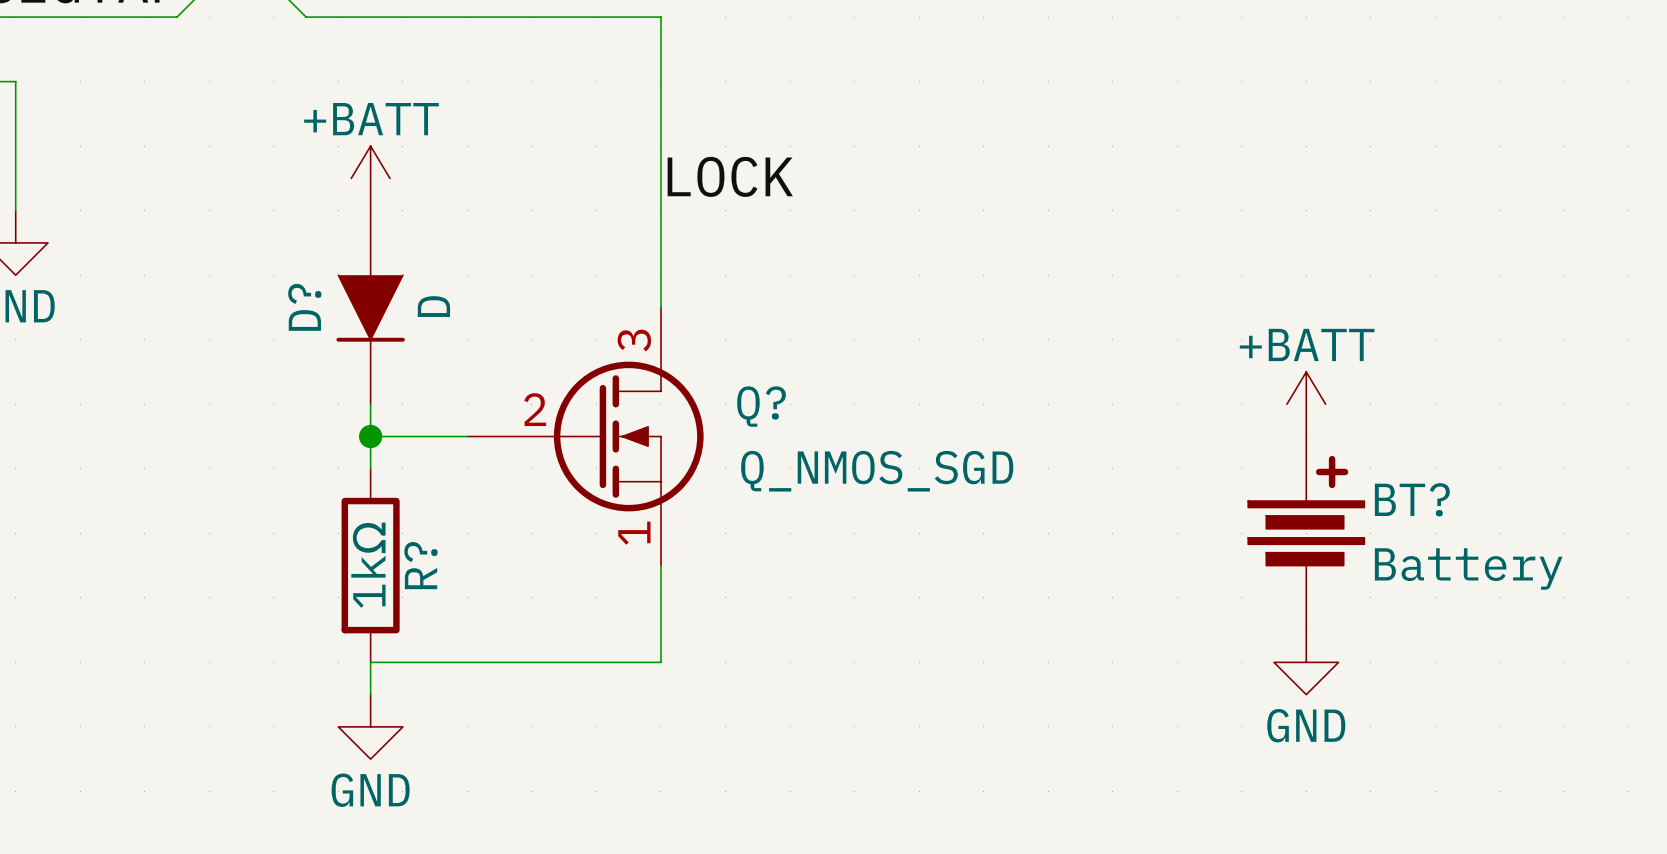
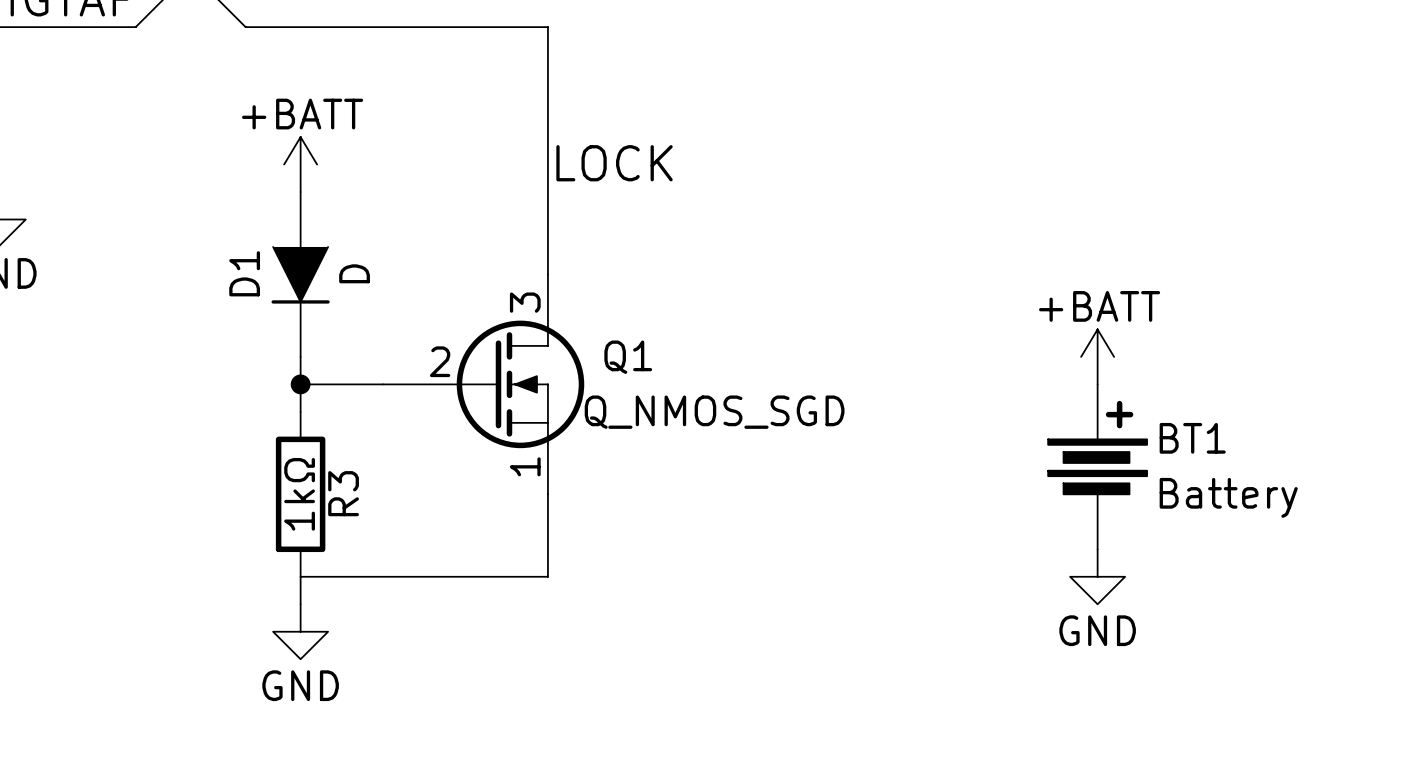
D? name: D? (304, 307) -> D1 (244, 273)
Q? name: Q? (761, 406) -> Q1 (628, 357)
BT? name: BT? (1412, 499) -> BT1 (1192, 438)
R? name: R? (420, 565) -> R3 (343, 493)

